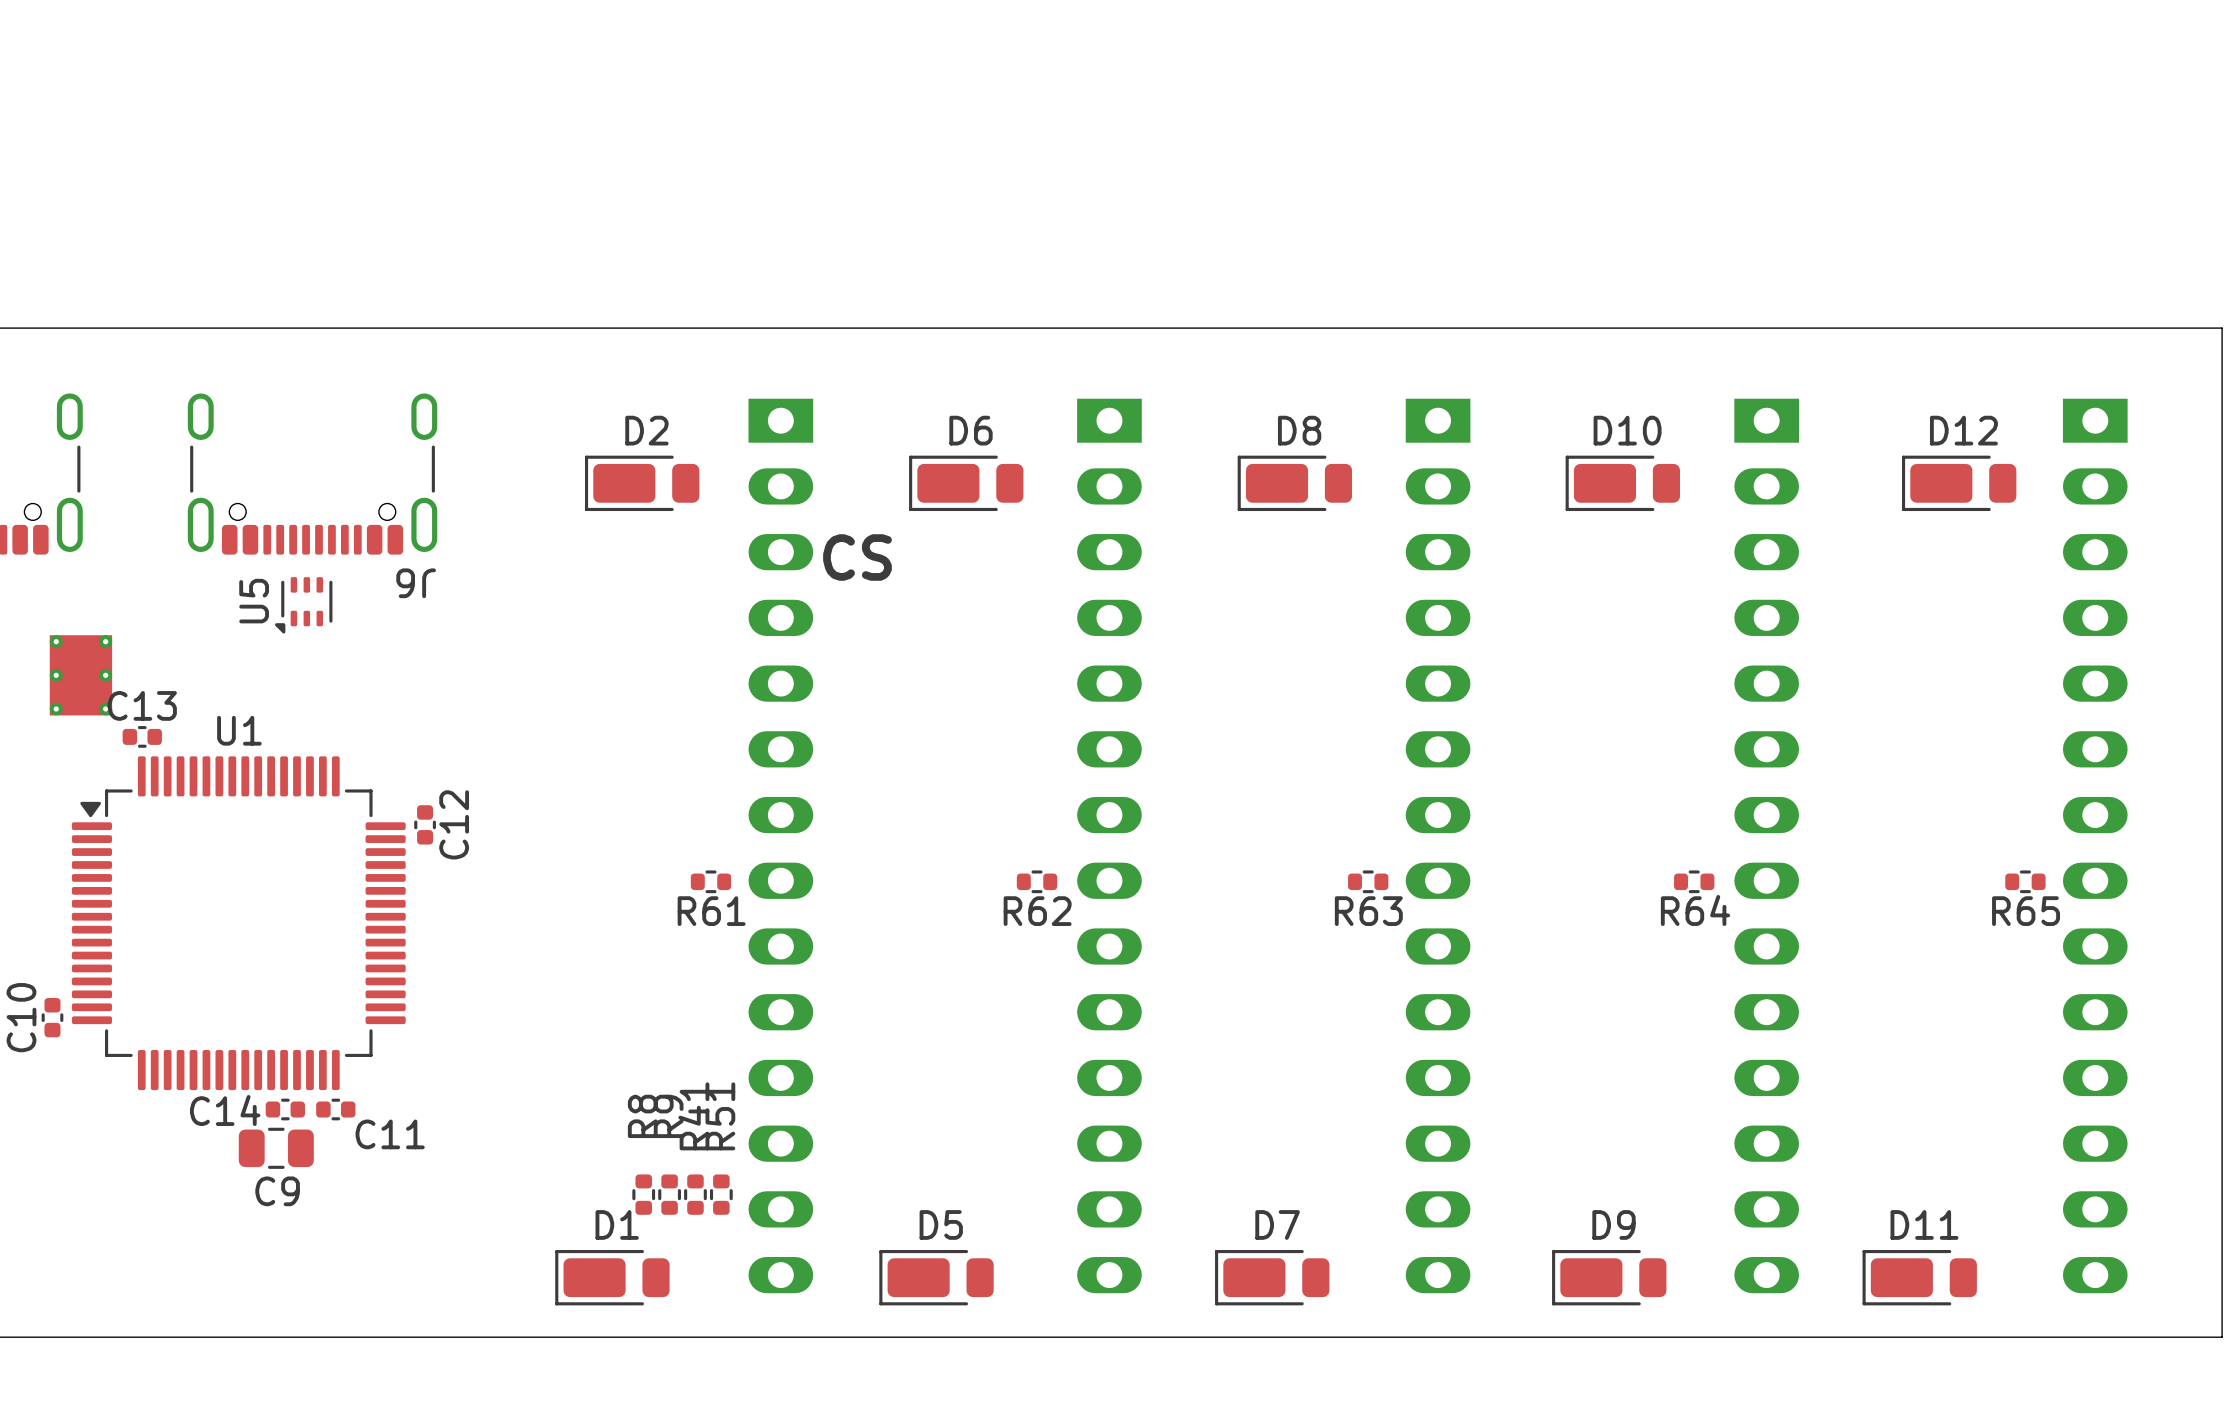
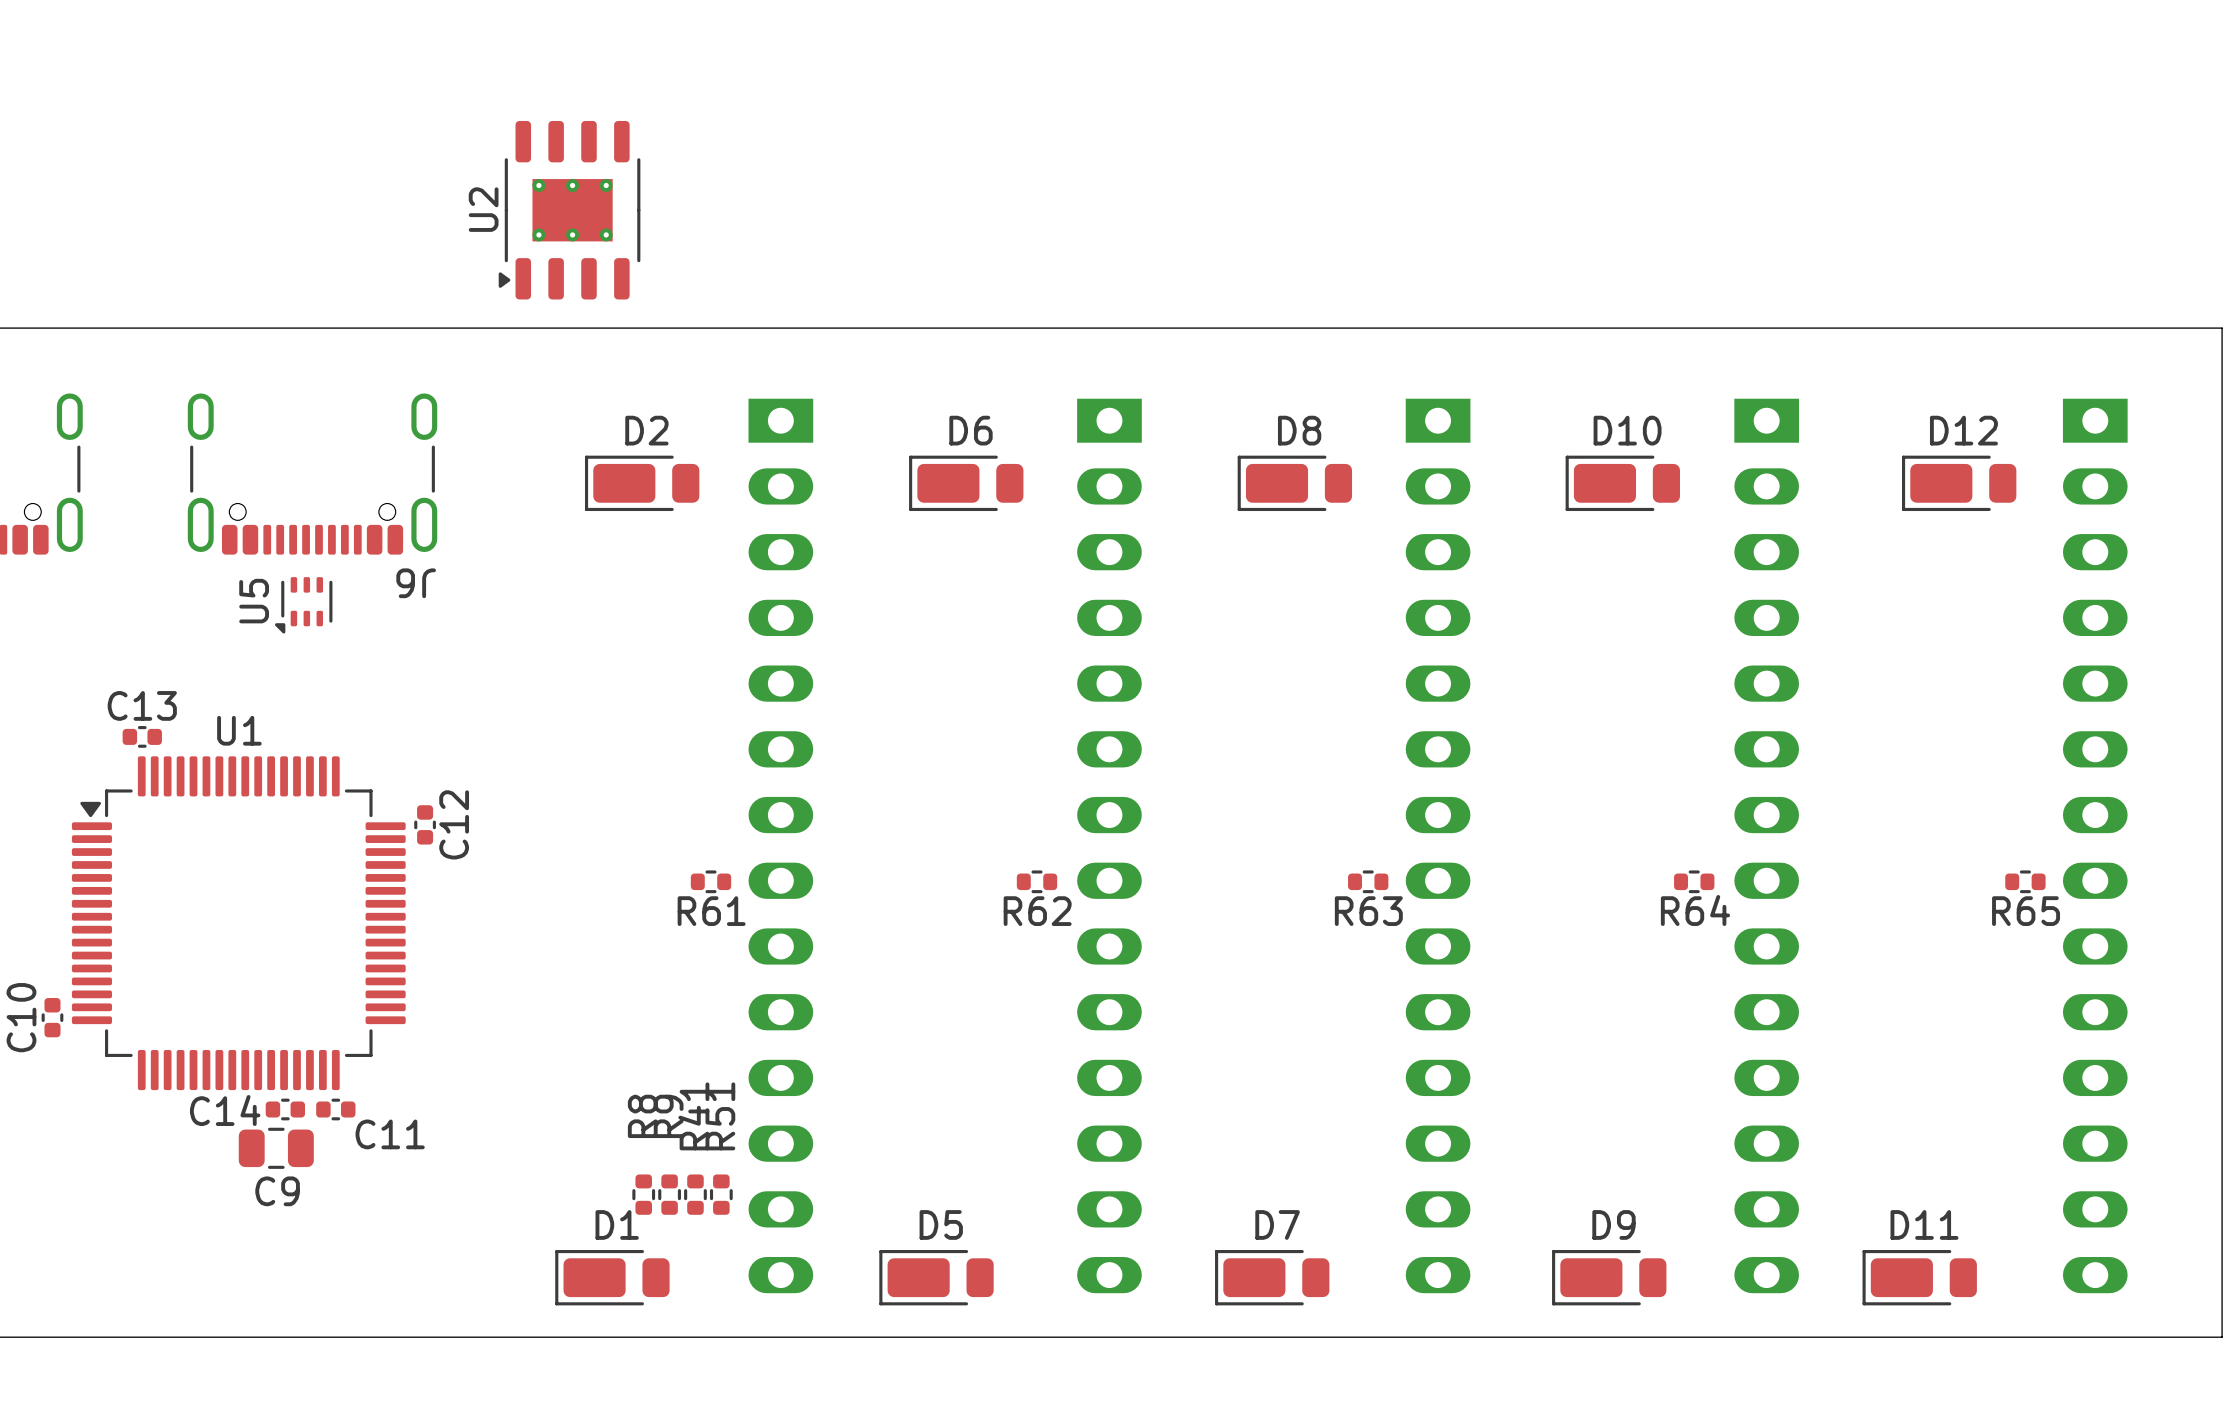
U2: none -> (569, 210)
text: CS (857, 557) -> none
part: (80, 675) -> none

